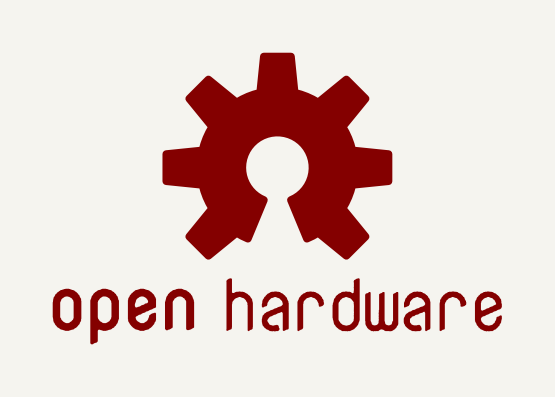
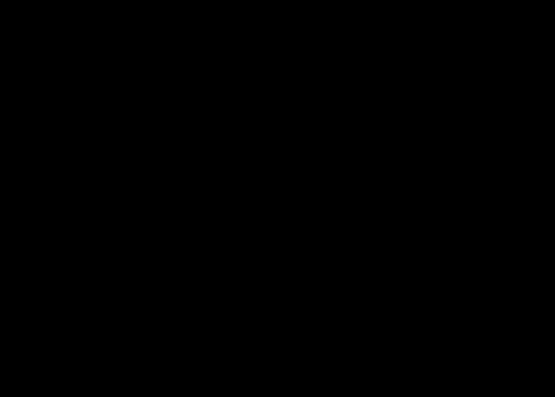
part: (277, 198) -> none

